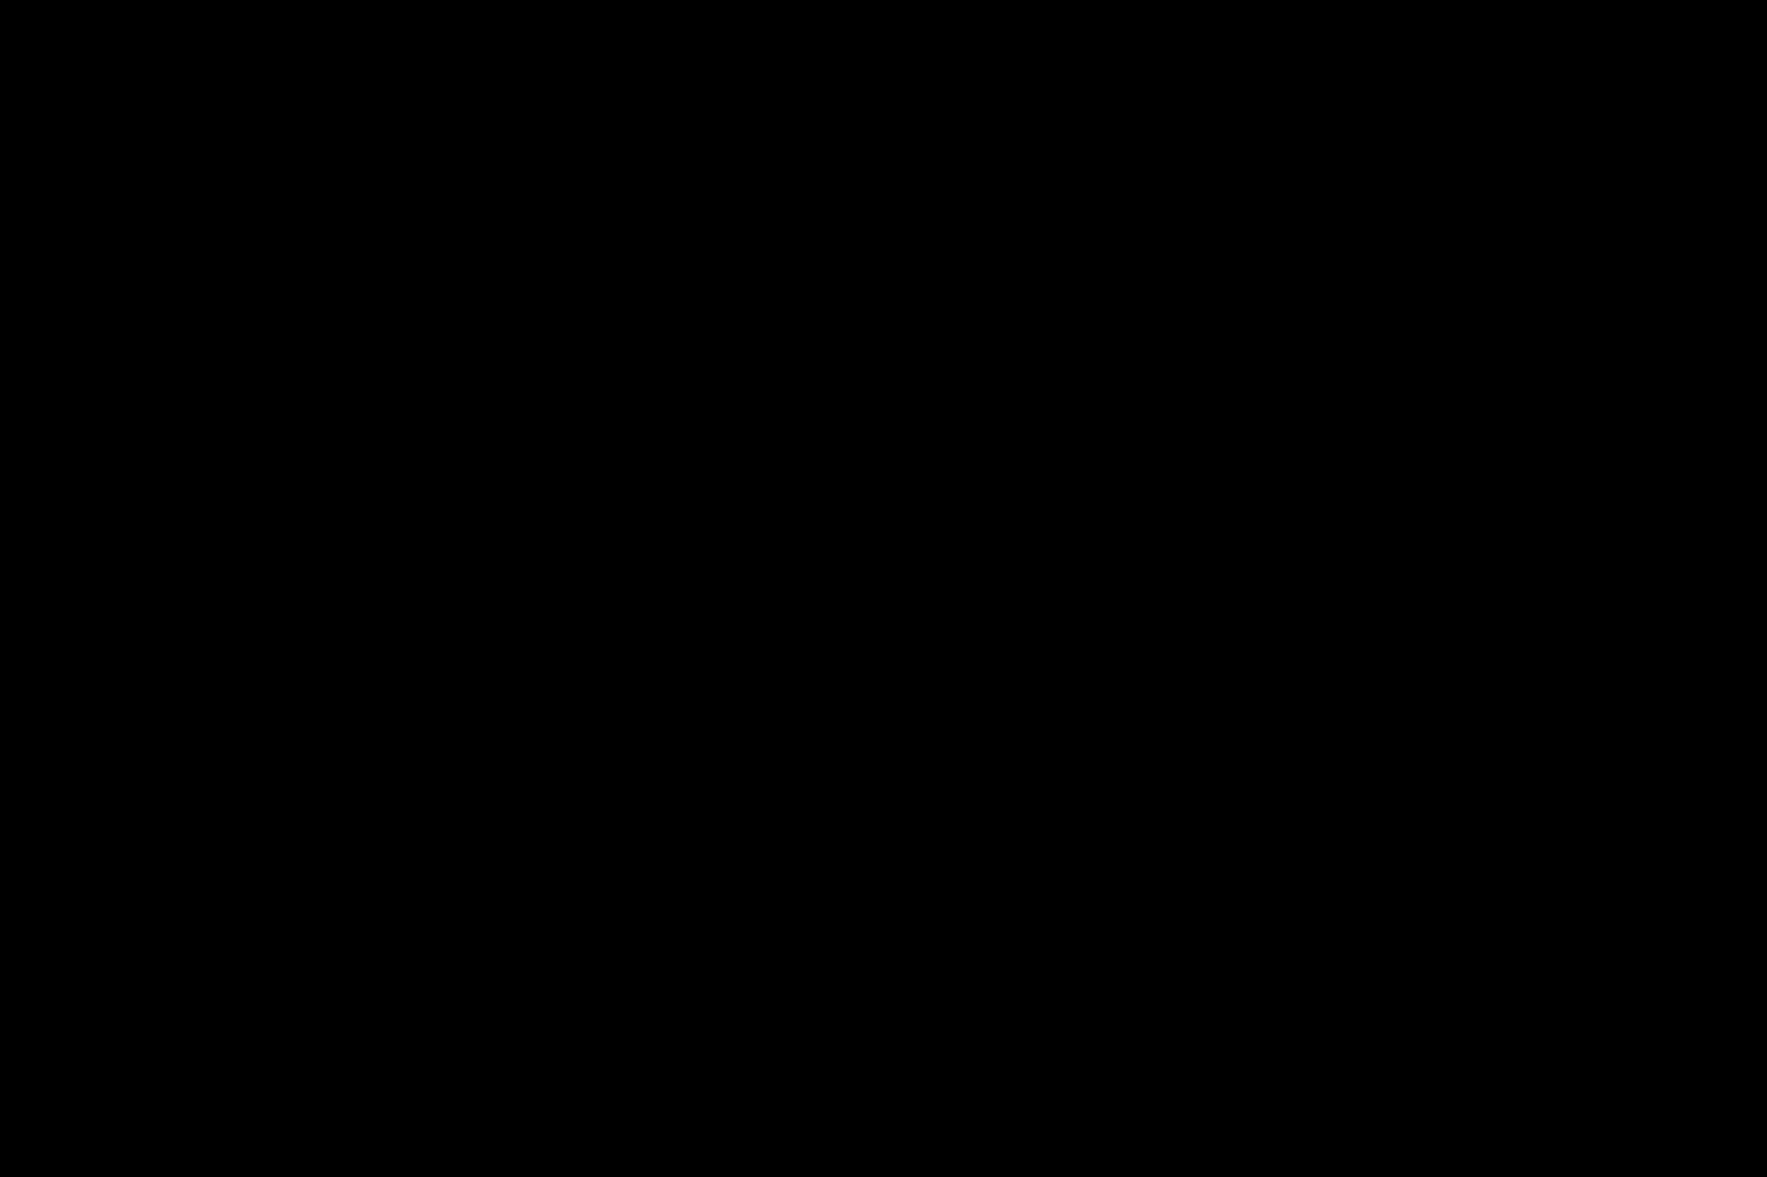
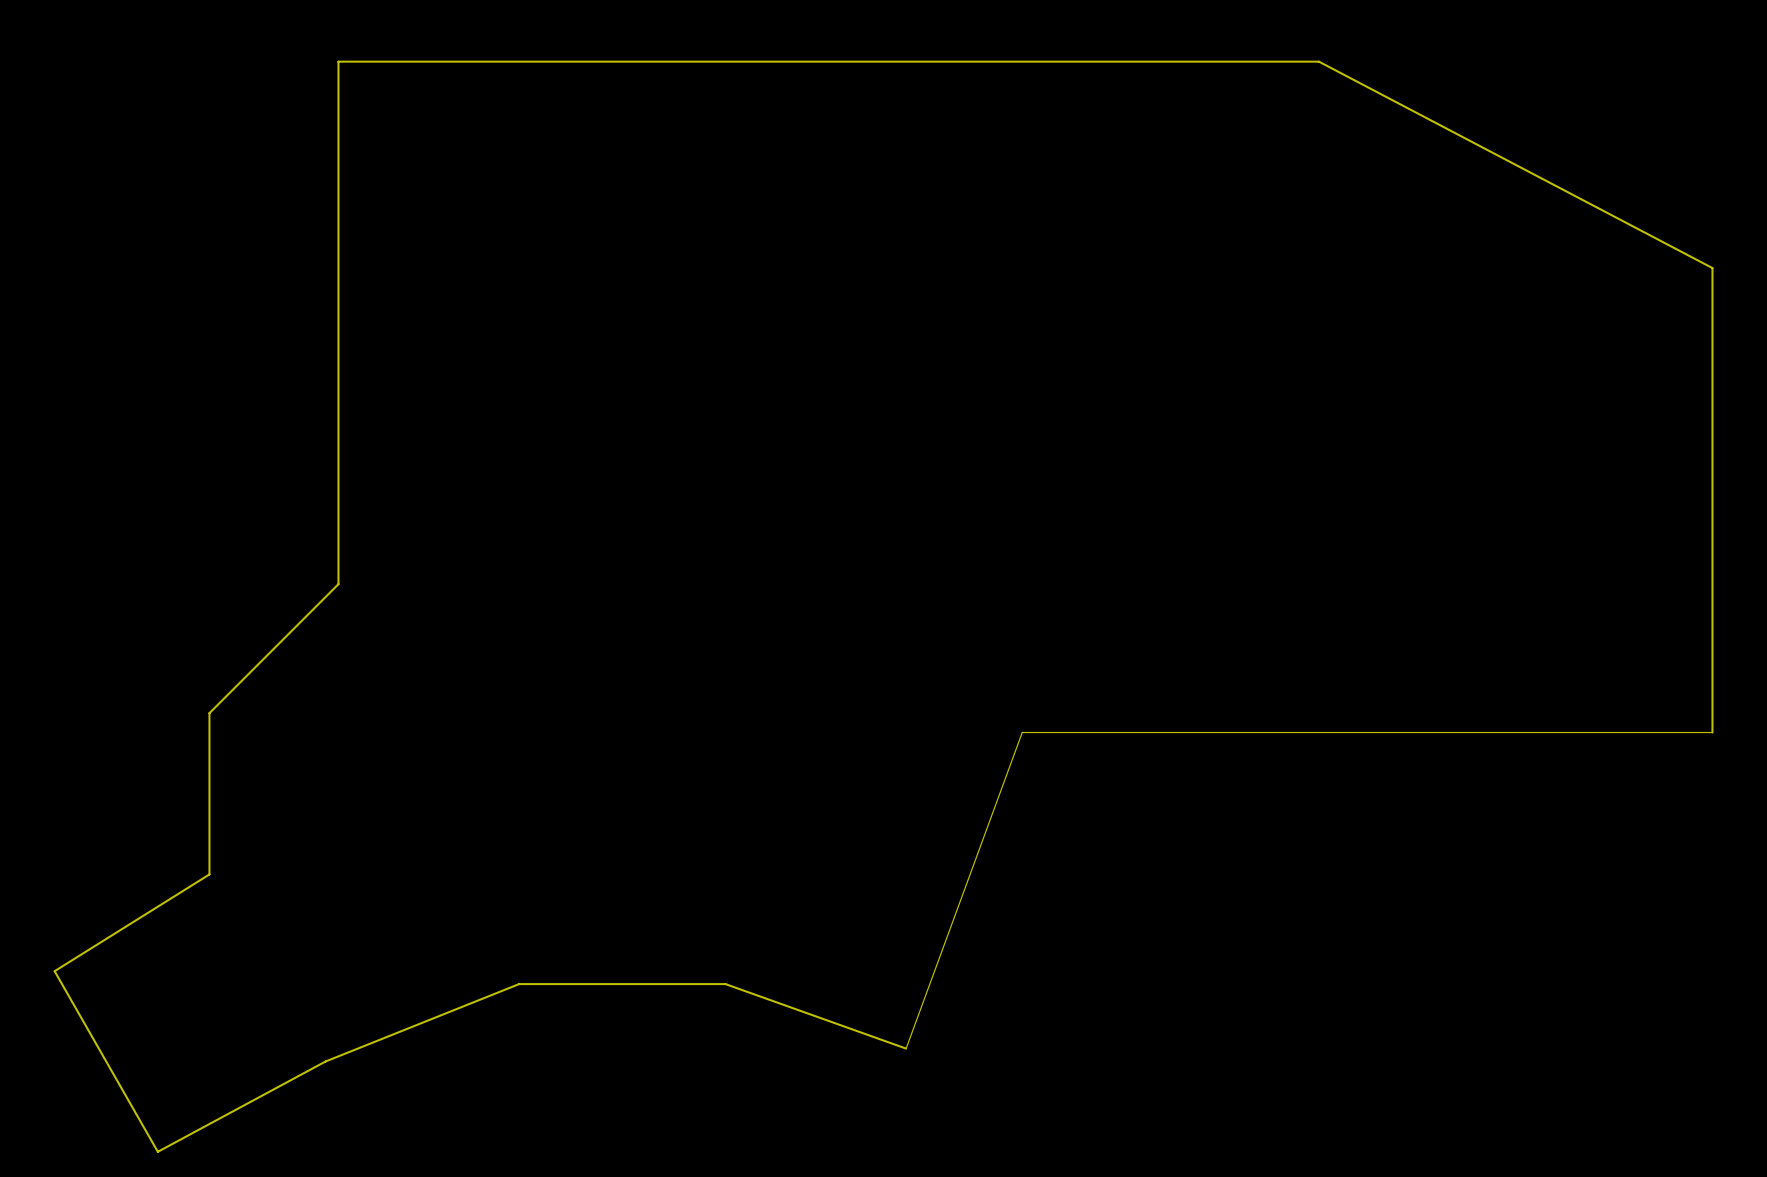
board edge: none -> (338, 61) (338, 584) (209, 713) (209, 874) (54, 971) (157, 1151) (325, 1061) (519, 984) (725, 984) (906, 1048) (1022, 732) (1712, 732) (1712, 268) (1318, 61) (338, 61)

